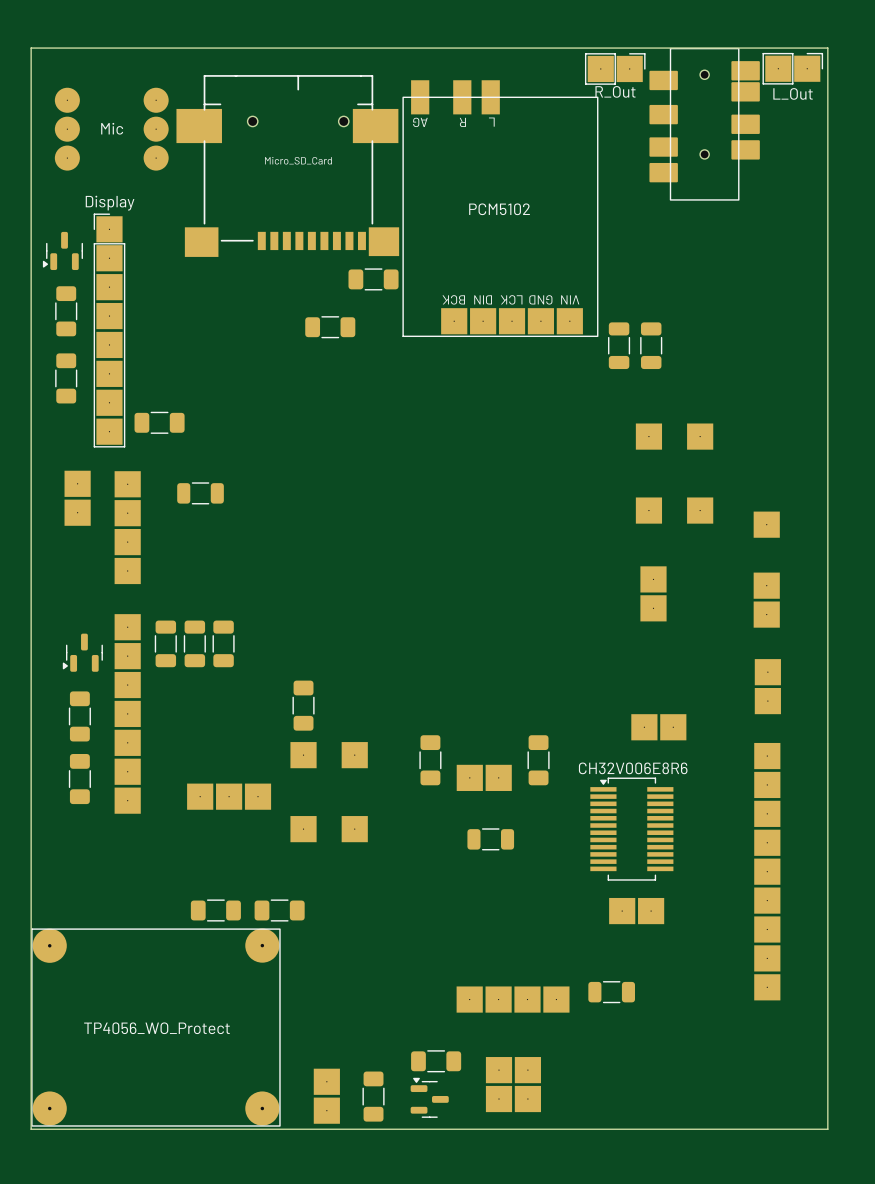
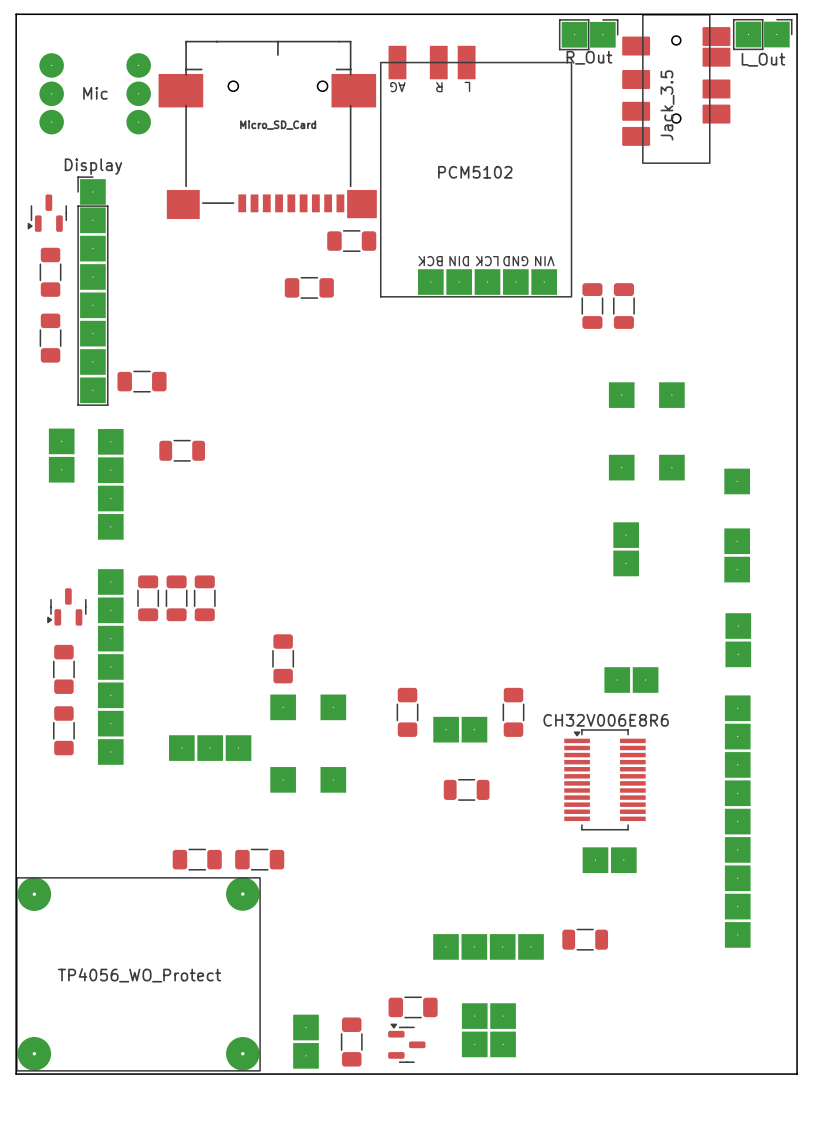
part value: none -> Jack_3.5 (667, 105)

